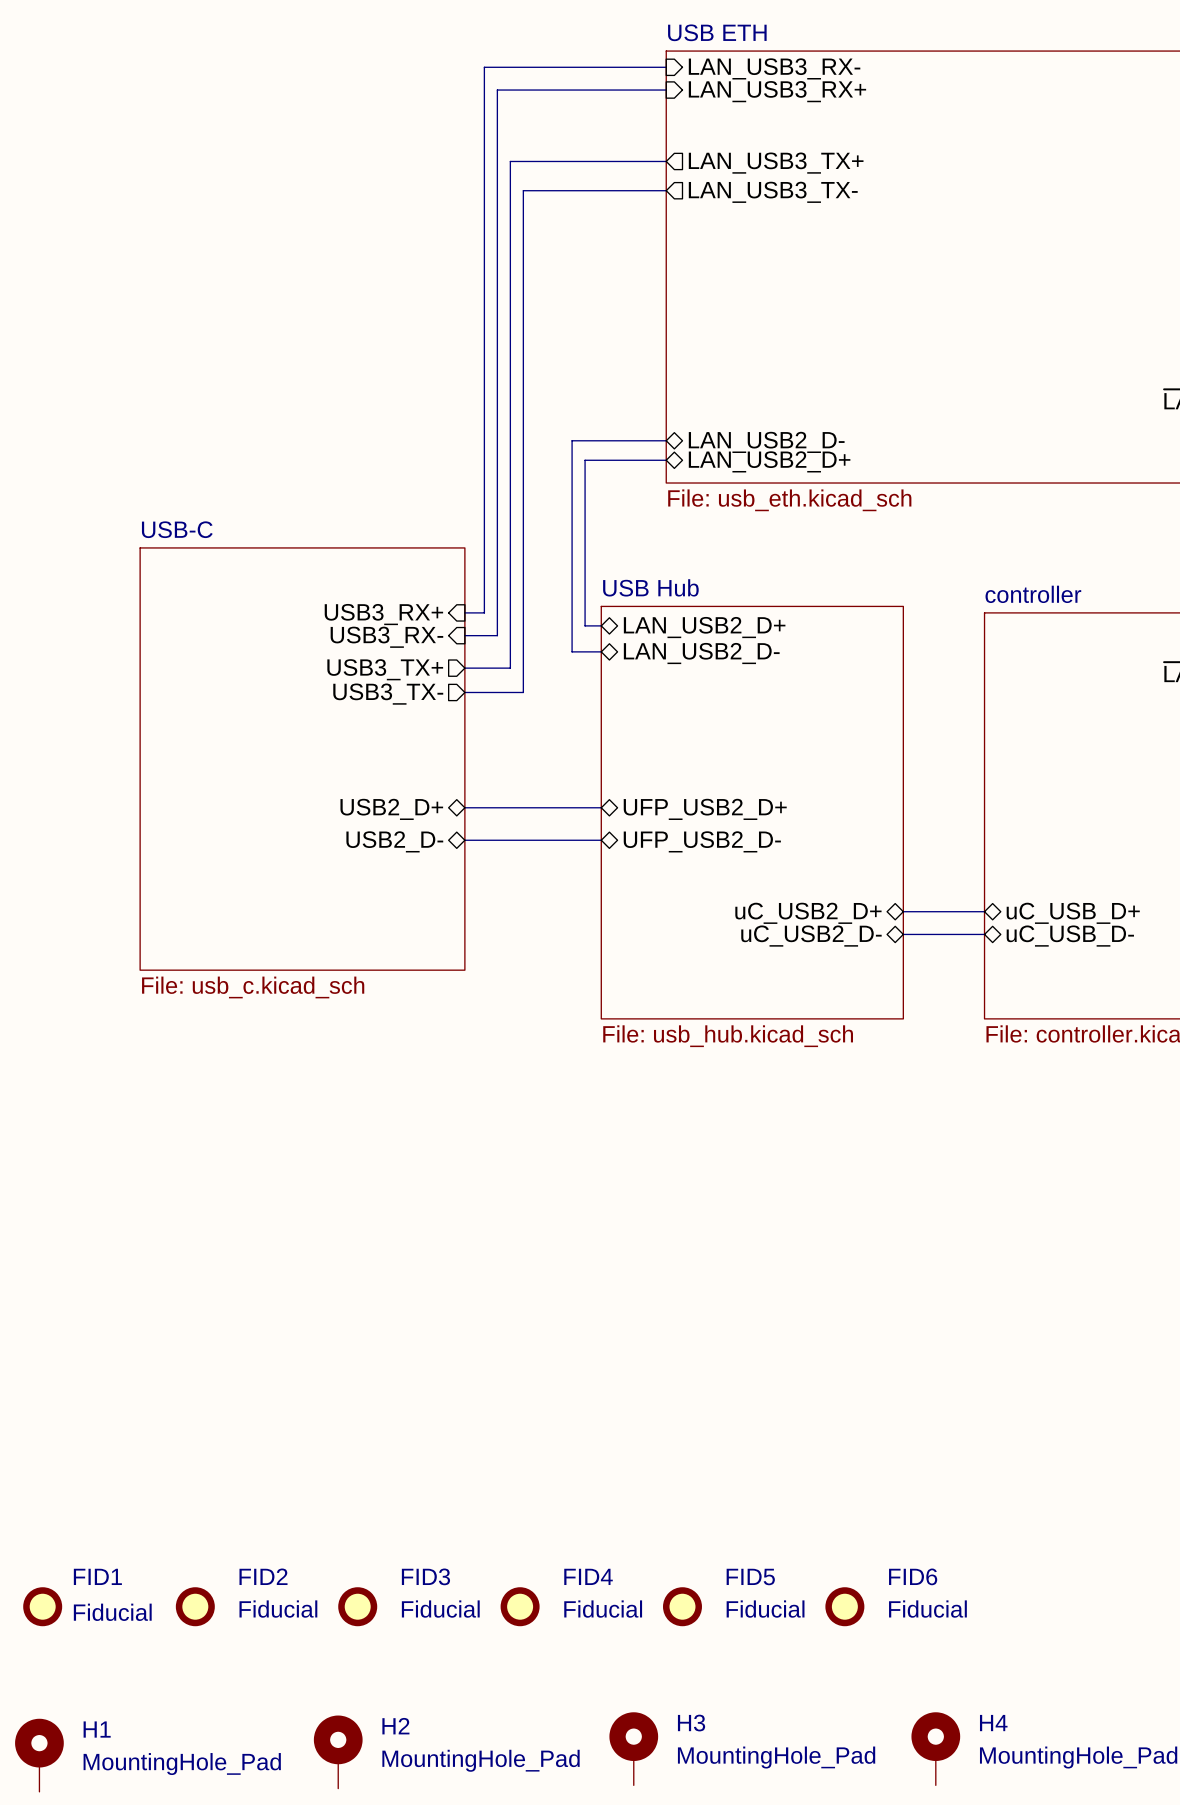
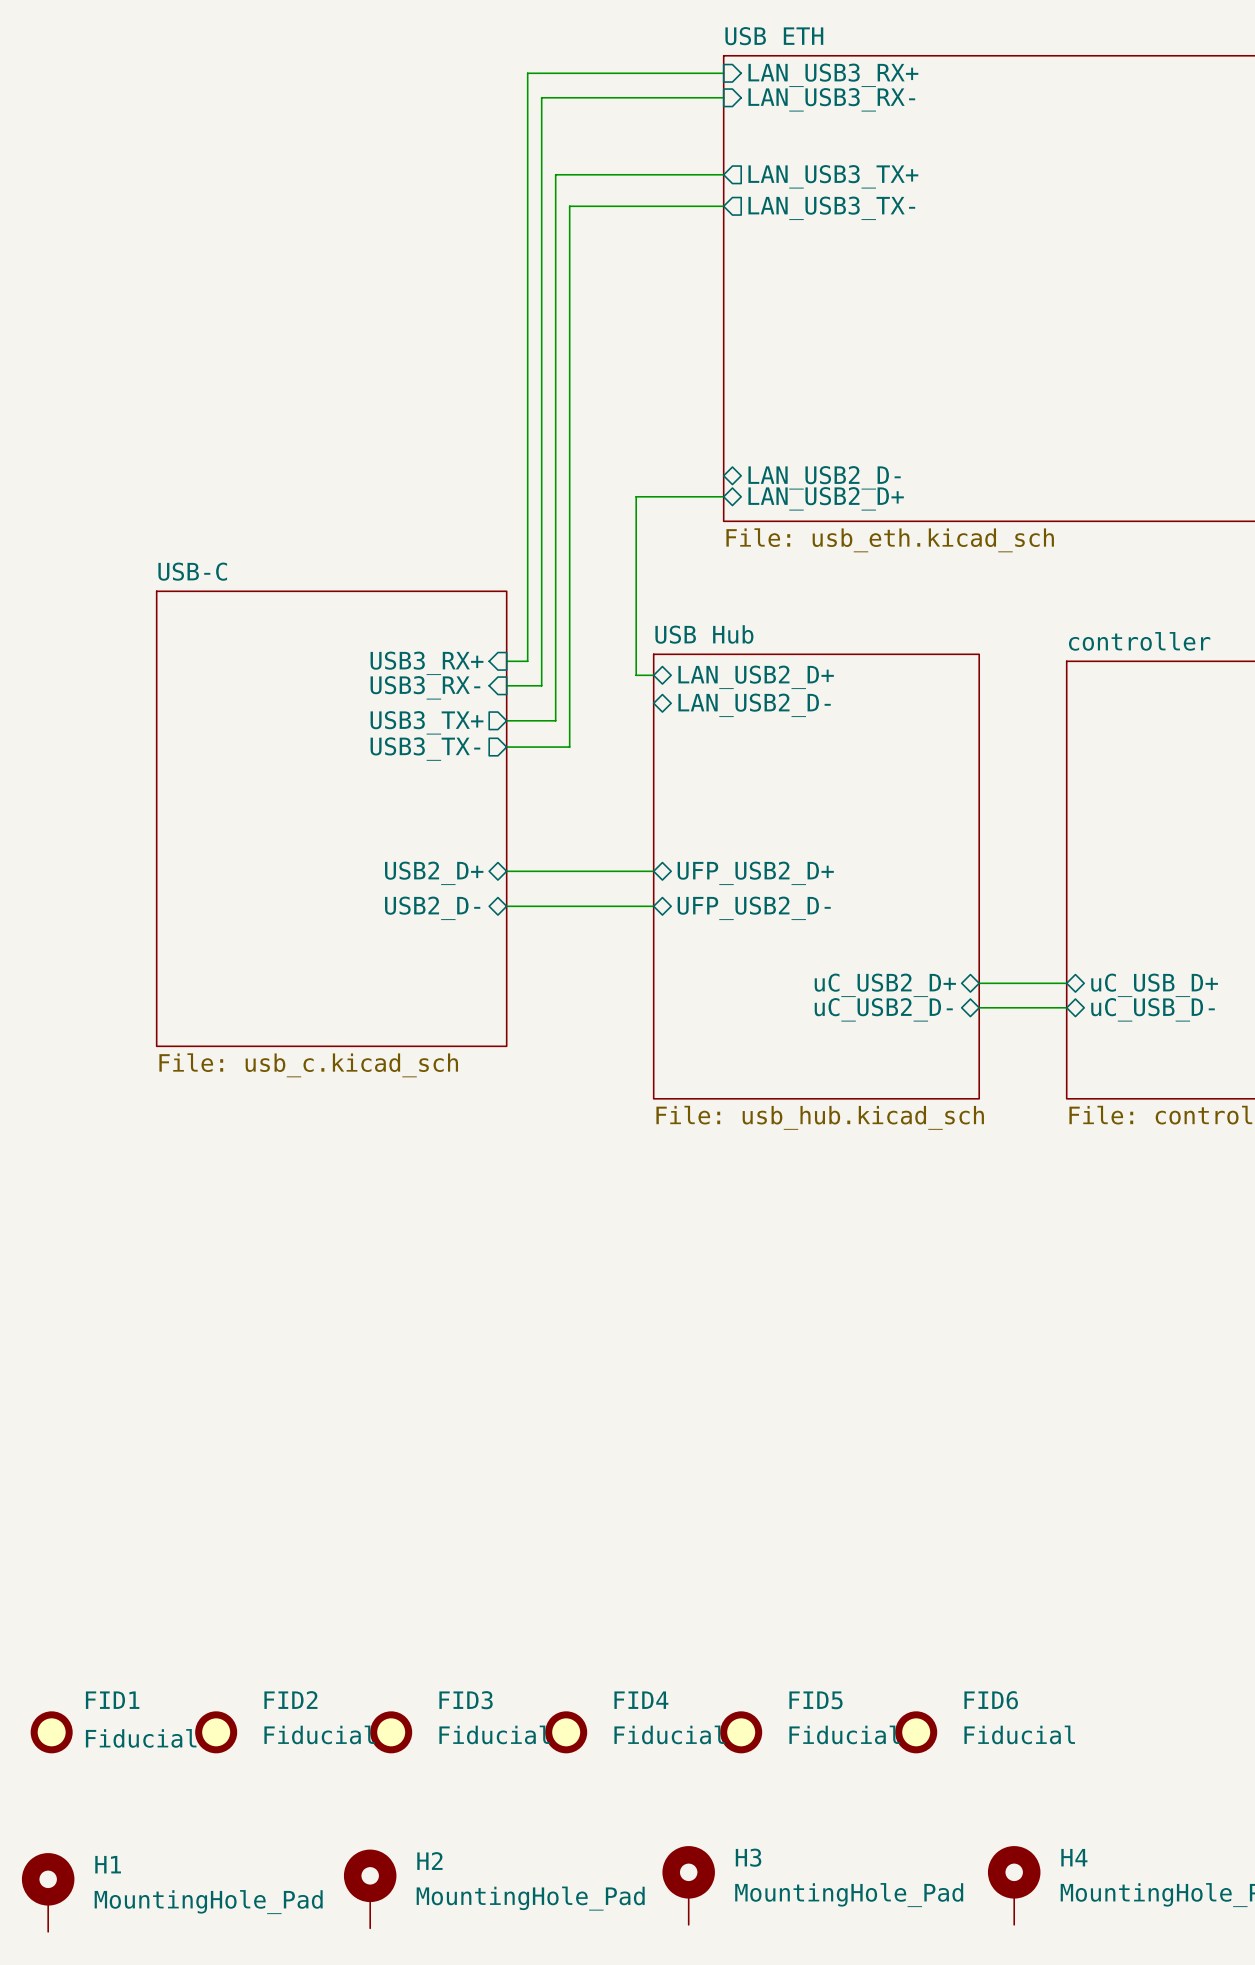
sheet pin: LAN_USB3_RX- (774, 68) -> LAN_USB3_RX+ (833, 75)
sheet pin: LAN_USB3_RX+ (777, 91) -> LAN_USB3_RX- (831, 99)
wire: (666, 440) (572, 440) (572, 651) (601, 651) -> none

